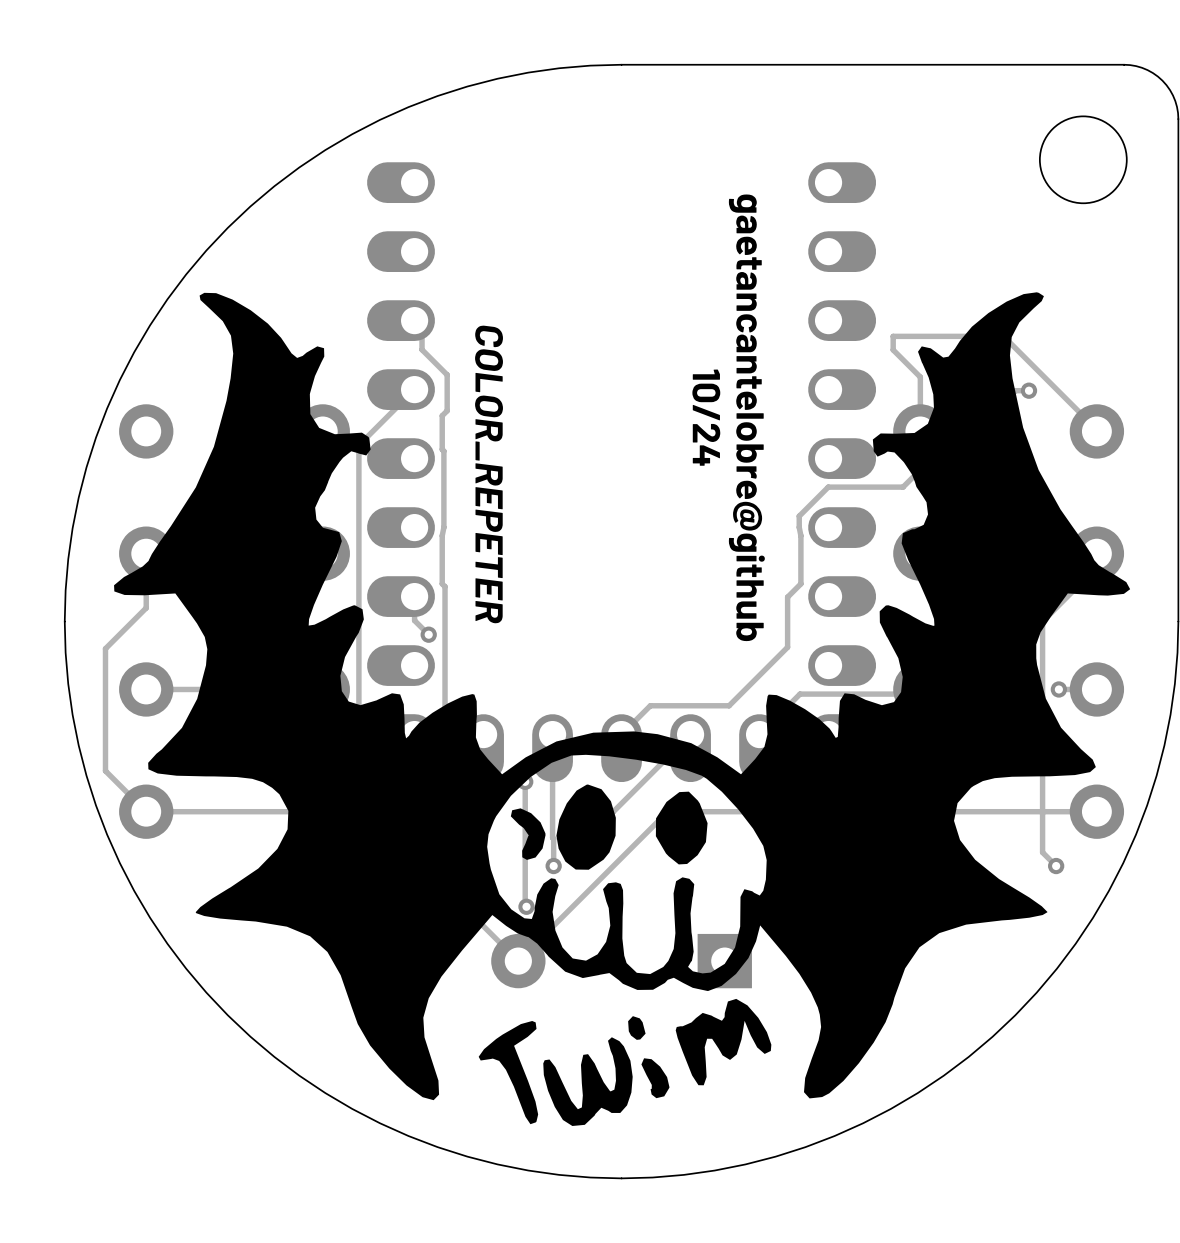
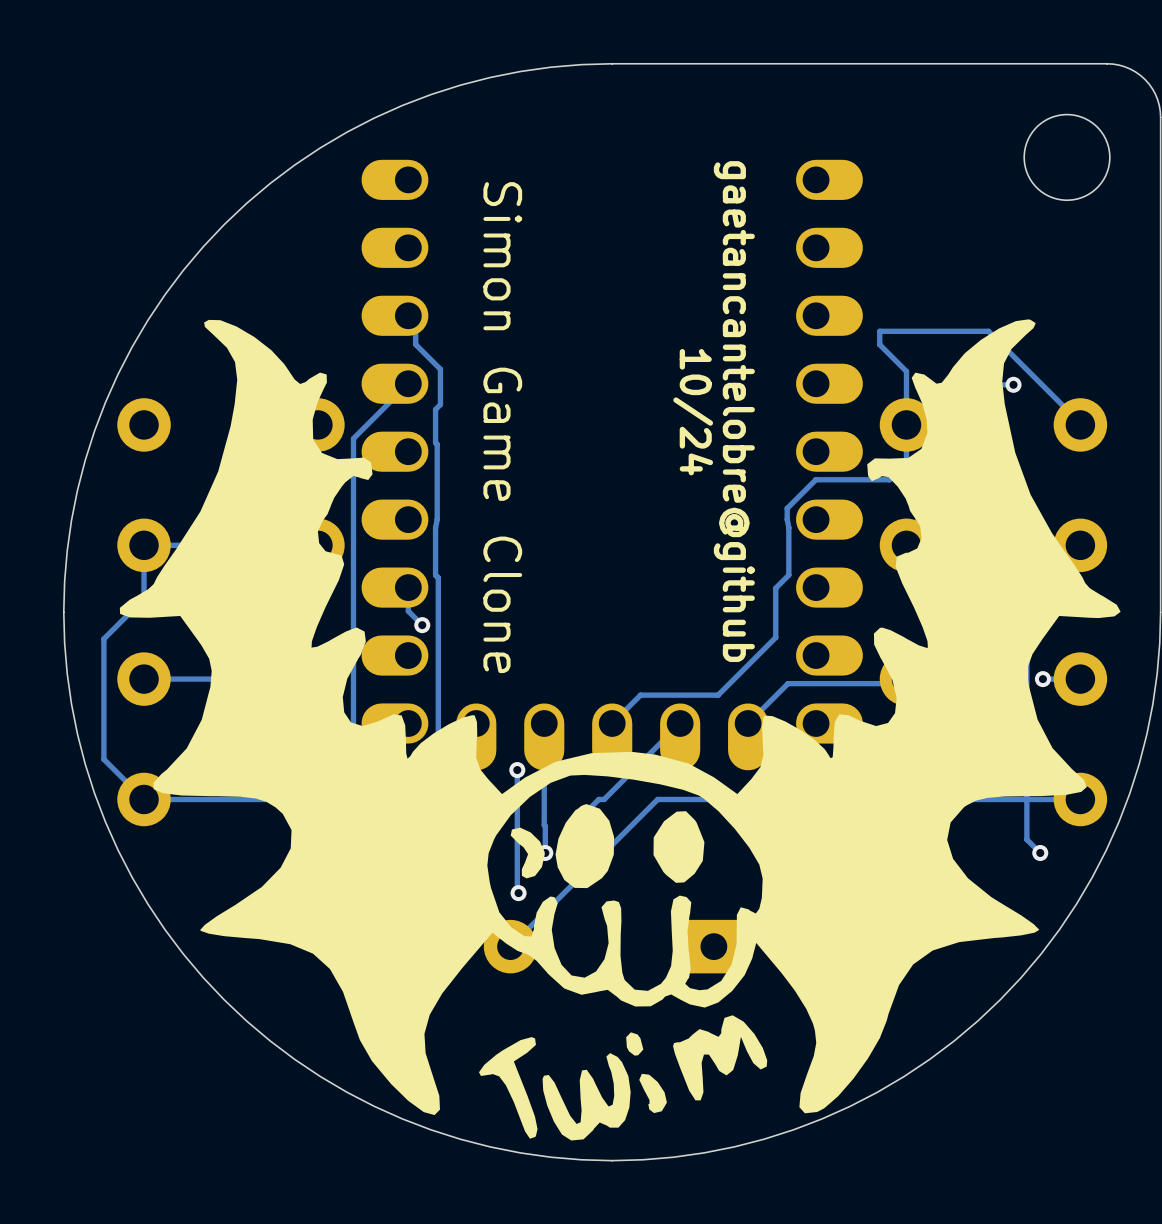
text: none -> Simon Game Clone (502, 427)
text: COLOR_REPETER (489, 474) -> none
drawing position: (622, 709) -> (620, 729)

